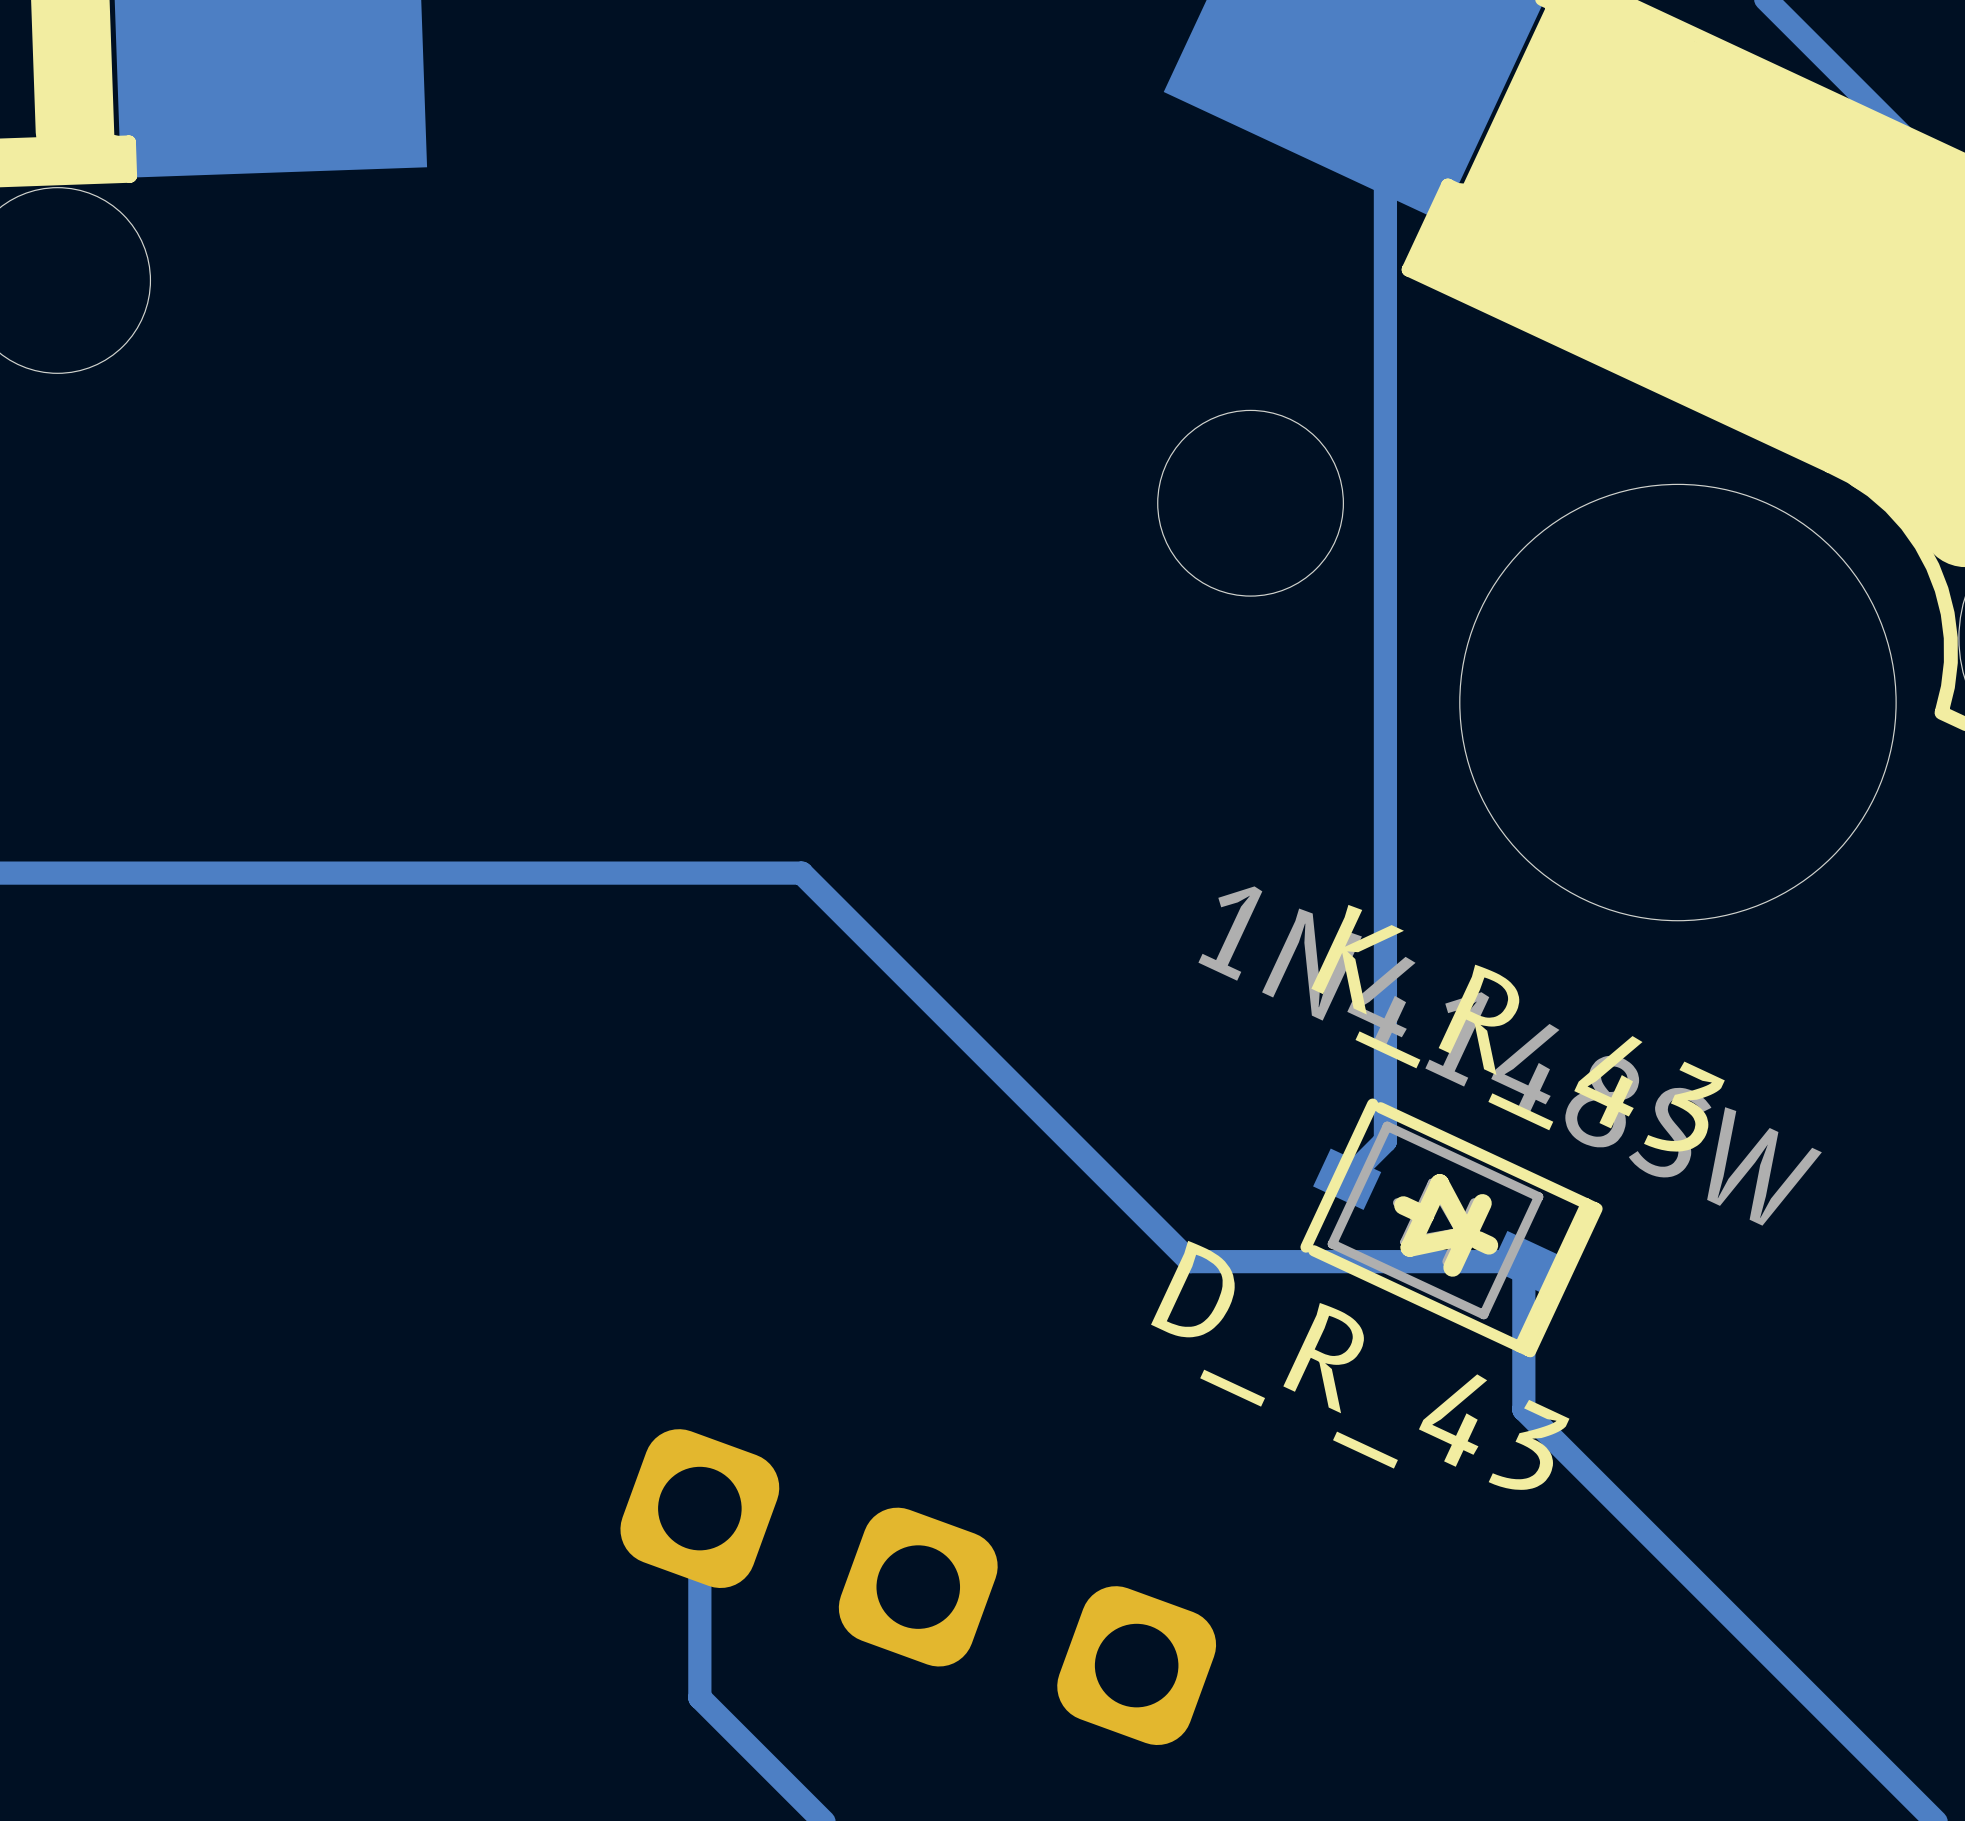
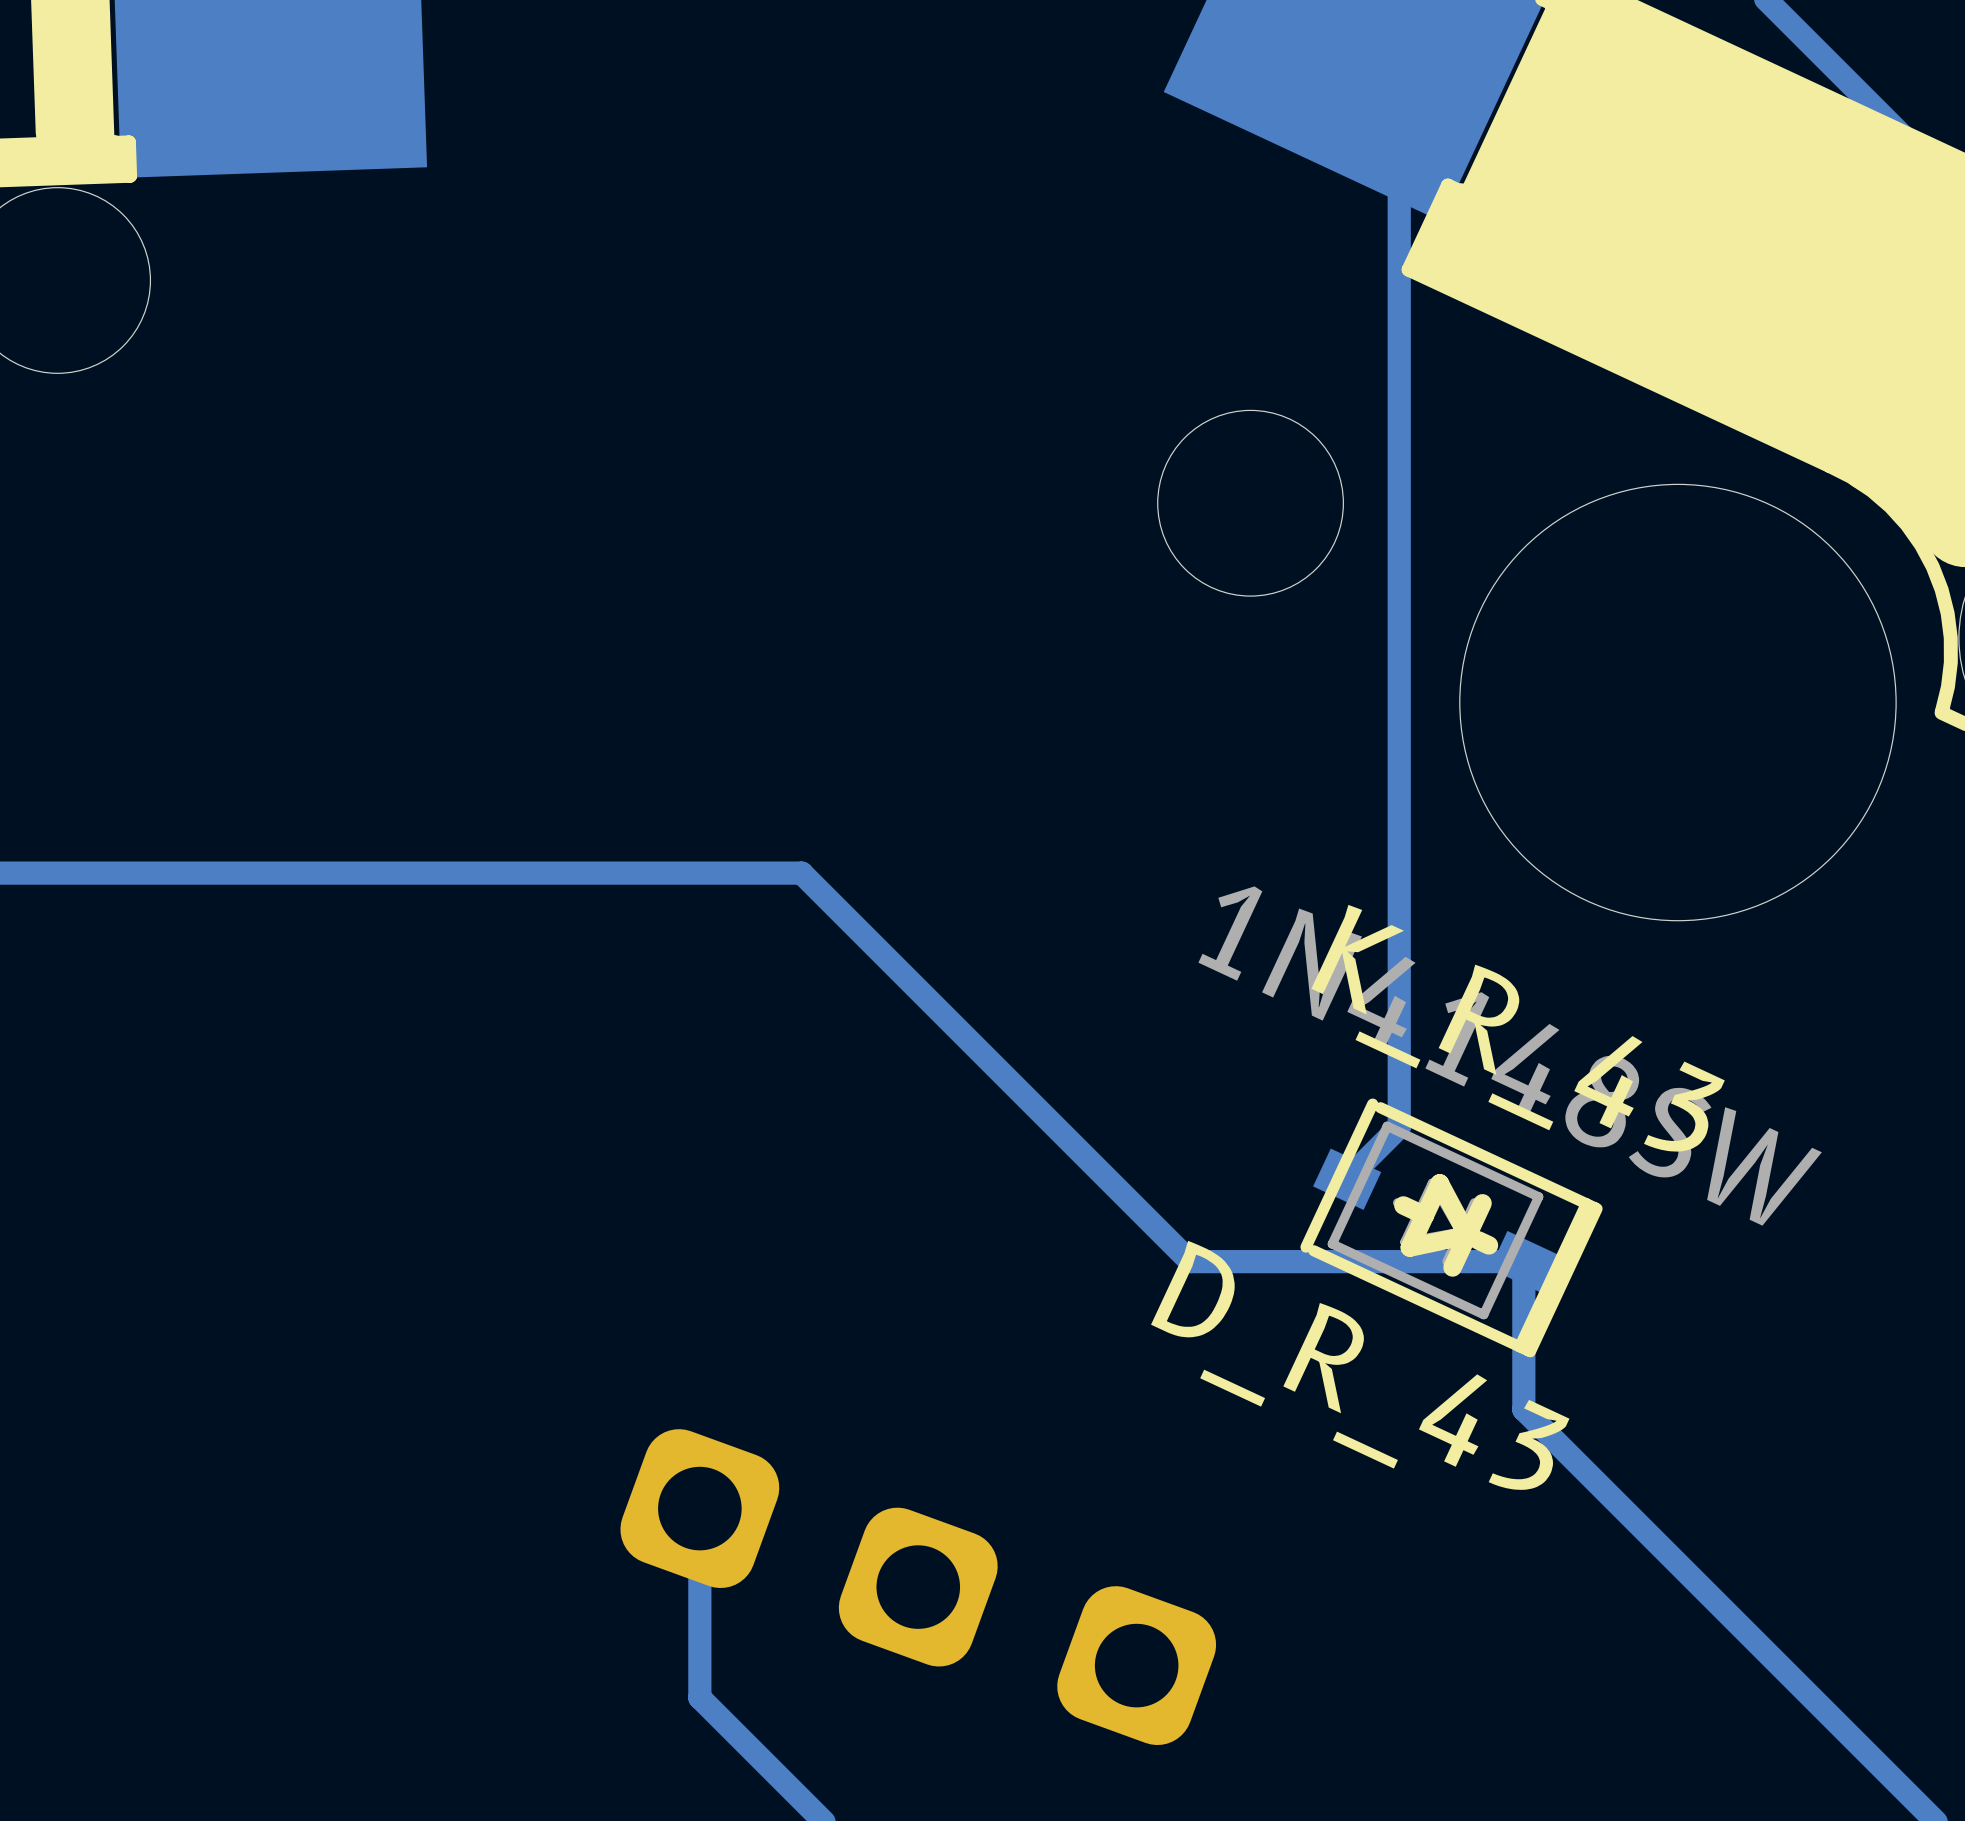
track: (1399, 48) (1385, 62) (1385, 1140) -> (1399, 48) (1399, 1127) (1385, 1140)

